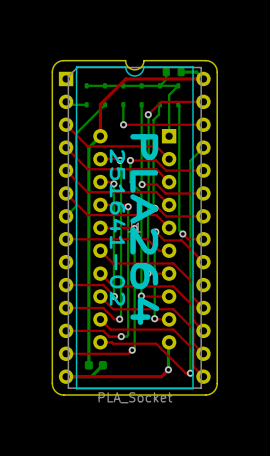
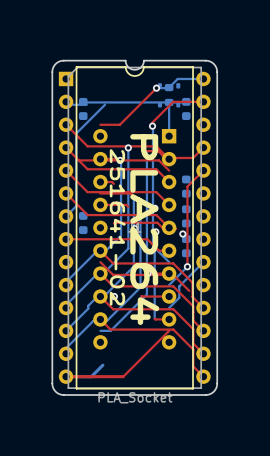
bottom track: (166, 72) (166, 79) (159, 85) -> none
part rotation: 0° (173, 72) -> 90° clockwise (169, 95)
part position: (173, 72) -> (169, 95)
bottom track: (181, 72) (196, 72) (203, 78) -> (156, 88) (168, 88) (177, 78) (203, 78)
top track: (203, 78) (125, 78) (100, 104) (100, 136) -> none
bottom track: (86, 85) (178, 85) (169, 95) (169, 102) -> none
top track: none -> (156, 88) (119, 124) (100, 124)
via: none -> (156, 88)
part: (86, 95) -> none
part: (105, 95) -> none
part: (123, 95) -> none
part: (141, 95) -> none
bottom track: none -> (83, 101) (186, 101)
top track: (173, 101) (161, 101) (148, 114) -> (173, 101) (152, 122) (152, 126)
bottom track: (123, 104) (123, 124) -> none
bottom track: (141, 104) (142, 184) -> none
bottom track: (159, 104) (158, 114) (153, 119) (154, 208) -> none
bottom track: (178, 104) (179, 230) (182, 233) -> none
part: none -> (83, 108)
part: none -> (186, 108)
bottom track: (148, 114) (148, 273) -> none
via position: (148, 114) -> (152, 126)
top track: (123, 124) (203, 124) -> none
via: (123, 124) -> none
bottom track: none -> (152, 126) (152, 246) (169, 262)
bottom track: (100, 136) (88, 147) (88, 365) -> none
bottom track: none -> (128, 147) (128, 248) (102, 274) (96, 274) (66, 305) (66, 307)
via: none -> (128, 147)
top track: none -> (203, 147) (193, 157) (165, 157) (158, 151) (146, 151)
bottom track: (203, 147) (190, 160) (190, 373) -> none
bottom track: none -> (146, 151) (146, 294) (110, 330) (100, 330)
bottom track: (130, 160) (130, 182) (141, 193) (141, 296) -> none
via: (130, 160) -> none
top track: (156, 160) (166, 170) (203, 170) -> (156, 160) (158, 160) (169, 170)
top track: none -> (203, 170) (187, 186) (187, 266)
bottom track: (113, 183) (114, 296) -> none
via: (113, 183) -> none
top track: (142, 184) (156, 184) (165, 193) (203, 193) -> none
via: (142, 184) -> none
part: none -> (186, 186)
top track: none -> (100, 193) (130, 193) (134, 197)
bottom track: none -> (134, 197) (133, 266) (105, 295) (98, 295) (66, 330)
bottom track: (128, 206) (128, 335) (121, 336) -> none
via: (128, 206) -> none
top track: (154, 208) (158, 208) (166, 216) (203, 216) -> none
bottom track: none -> (140, 216) (140, 287) (107, 320) (93, 320) (66, 348) (66, 353)
part: none -> (186, 216)
part: none -> (83, 223)
top track: none -> (113, 223) (157, 222) (163, 228) (176, 228)
top track: (100, 227) (134, 228) -> none
bottom track: (134, 228) (134, 347) (132, 350) -> none
top track: (155, 231) (164, 240) (181, 240) (203, 262) -> none
top track: (182, 233) (188, 239) (203, 239) -> none
bottom track: (121, 235) (119, 319) -> (121, 235) (104, 252) (96, 252) (66, 282) (66, 285)
part: none -> (186, 246)
top track: none -> (100, 262) (113, 274) (173, 274) (189, 290)
bottom track: none -> (203, 262) (179, 286) (179, 297) (169, 307)
bottom track: none -> (187, 266) (169, 285)
via: none -> (187, 266)
top track: (66, 285) (103, 285) (114, 296) -> none
via: (141, 296) -> none
top track: (66, 307) (103, 307) (114, 319) (119, 319) -> none
via: (154, 318) -> none
via: (119, 319) -> none
top track: (66, 330) (103, 330) (109, 336) (121, 336) -> none
via: (121, 336) -> none
top track: (100, 342) (156, 343) (185, 373) (190, 373) -> none
bottom track: (169, 342) (168, 369) -> none
top track: (132, 350) (128, 353) (66, 353) -> none
via: (132, 350) -> none
part: (95, 365) -> none
top track: (168, 369) (161, 376) (123, 376) -> (169, 330) (123, 376)
via: (168, 369) -> none
via: (190, 373) -> none

